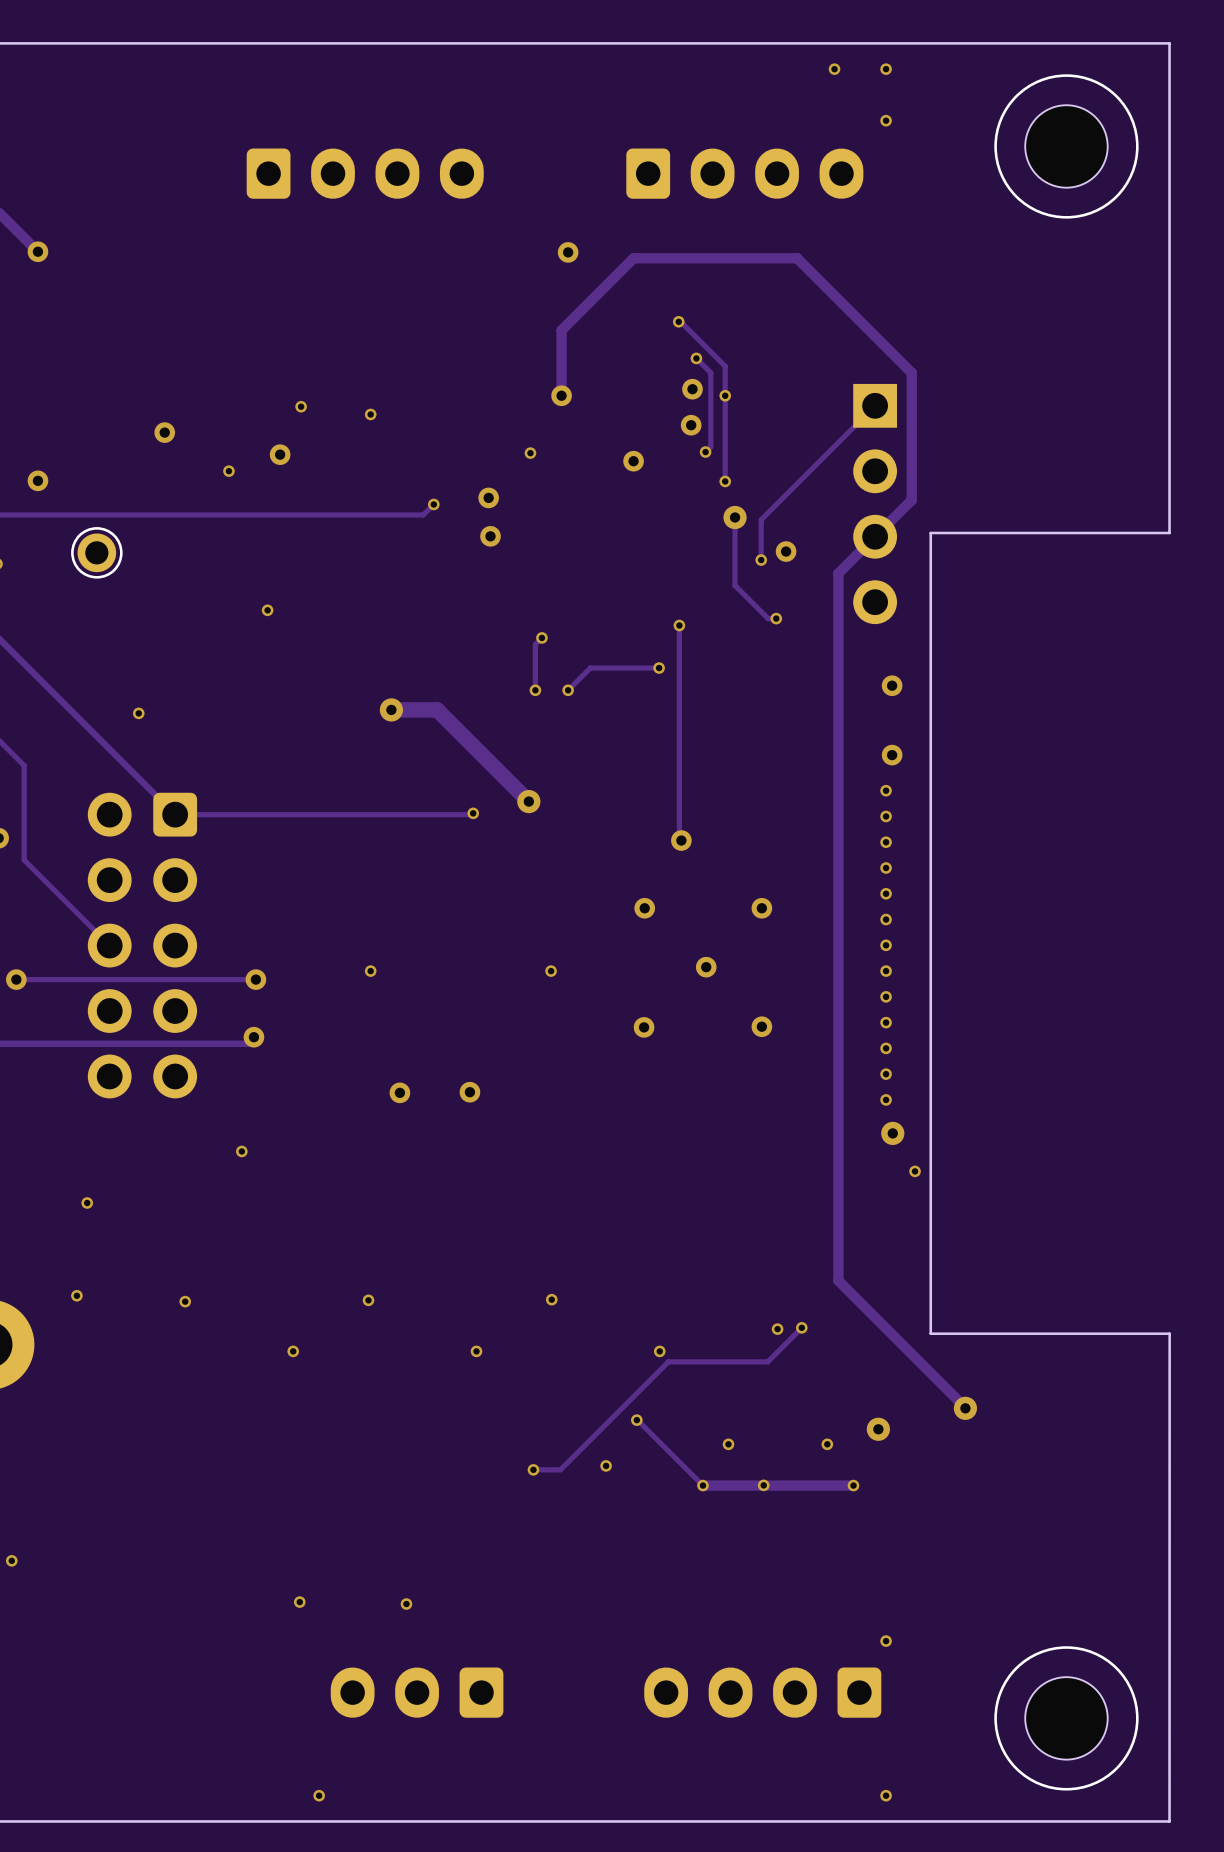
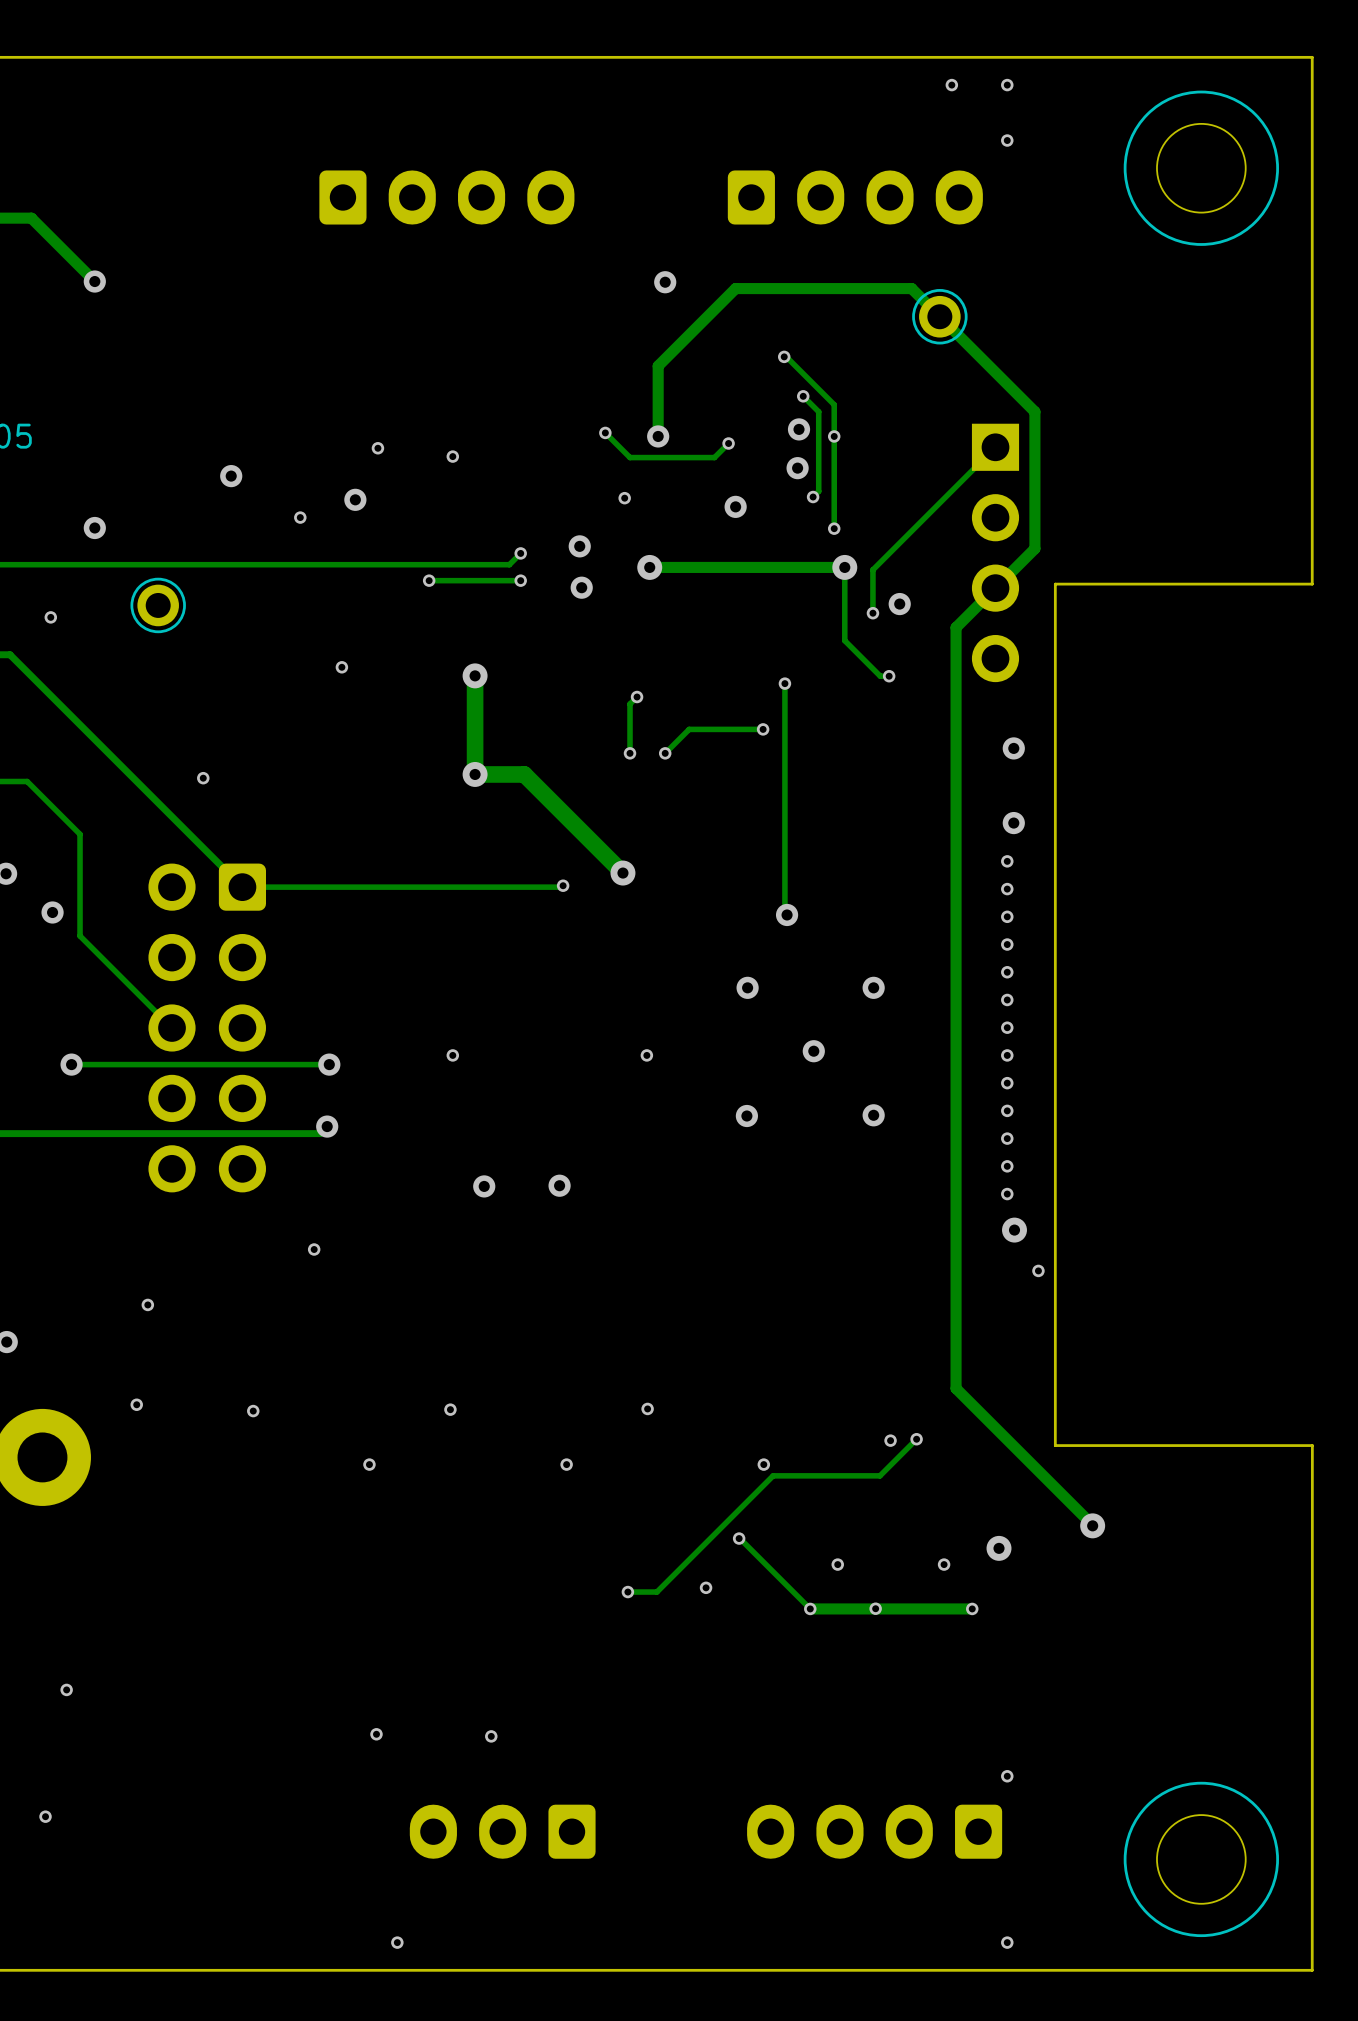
part: none -> (939, 316)
track: none -> (605, 432) (630, 457) (714, 457) (728, 443)
via: none -> (605, 432)
via: none -> (728, 443)
via: none -> (649, 567)
track: none -> (844, 567) (649, 567)
via: none -> (429, 580)
track: none -> (520, 580) (429, 580)
via: none -> (520, 580)
track: none -> (475, 675) (475, 774)
via: none -> (475, 675)

